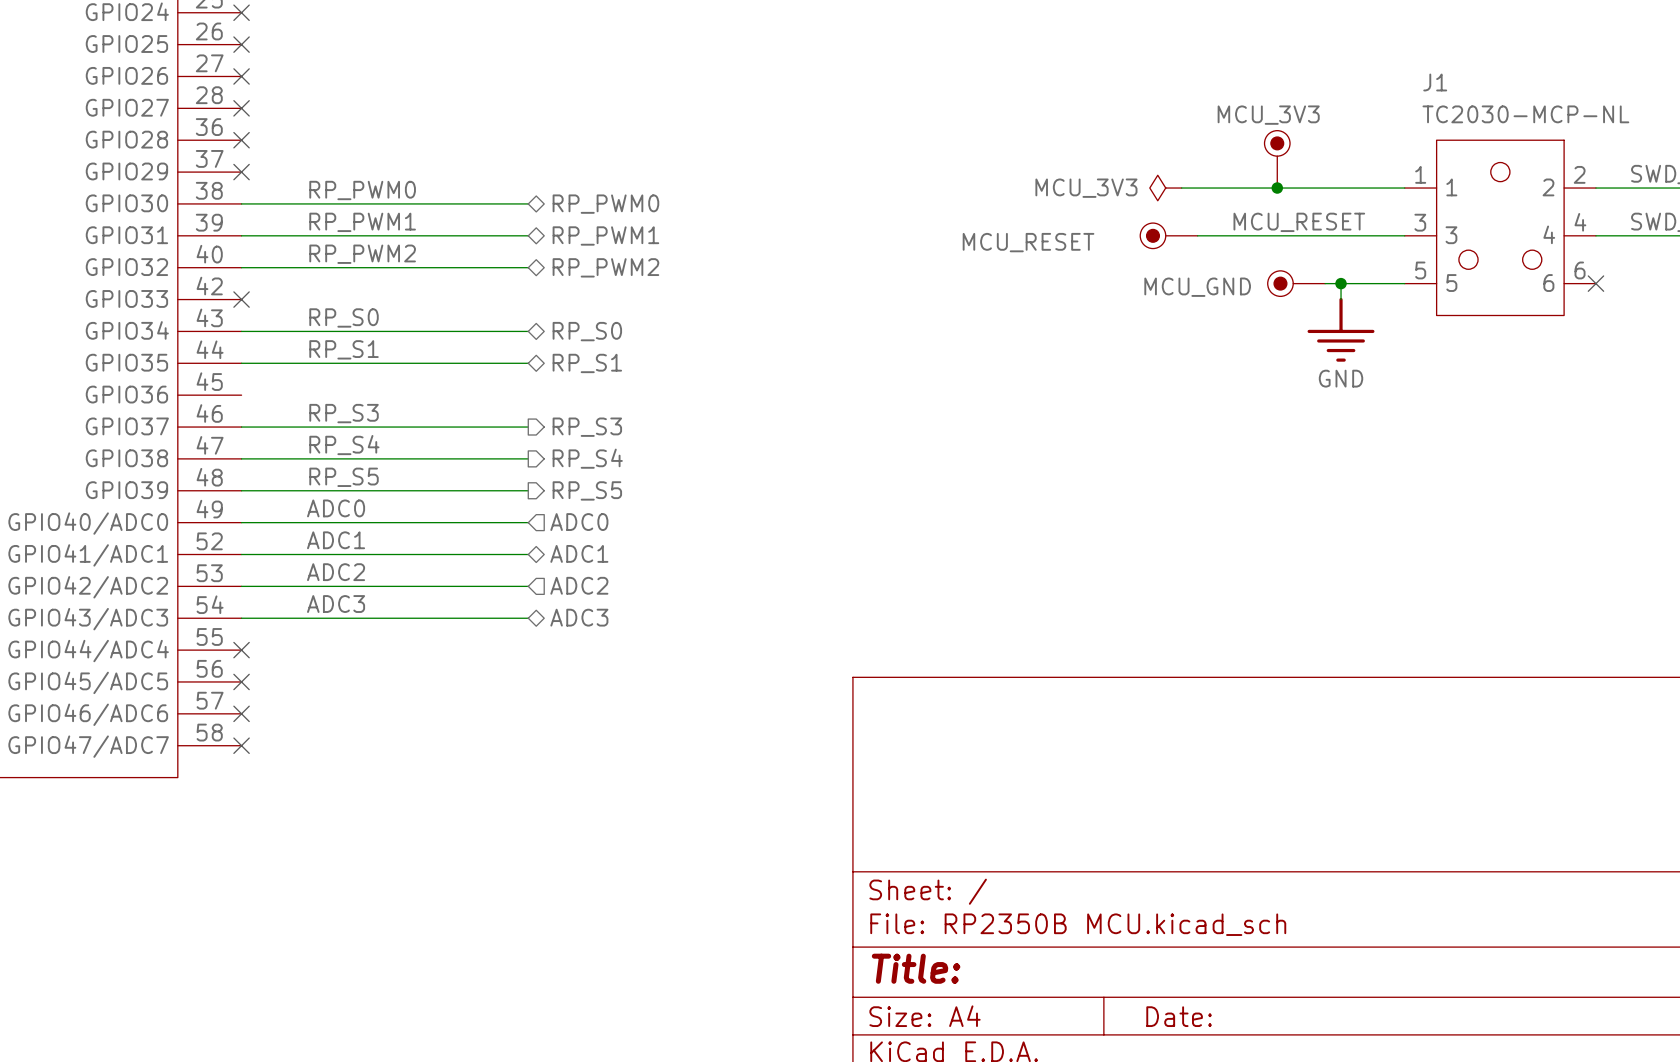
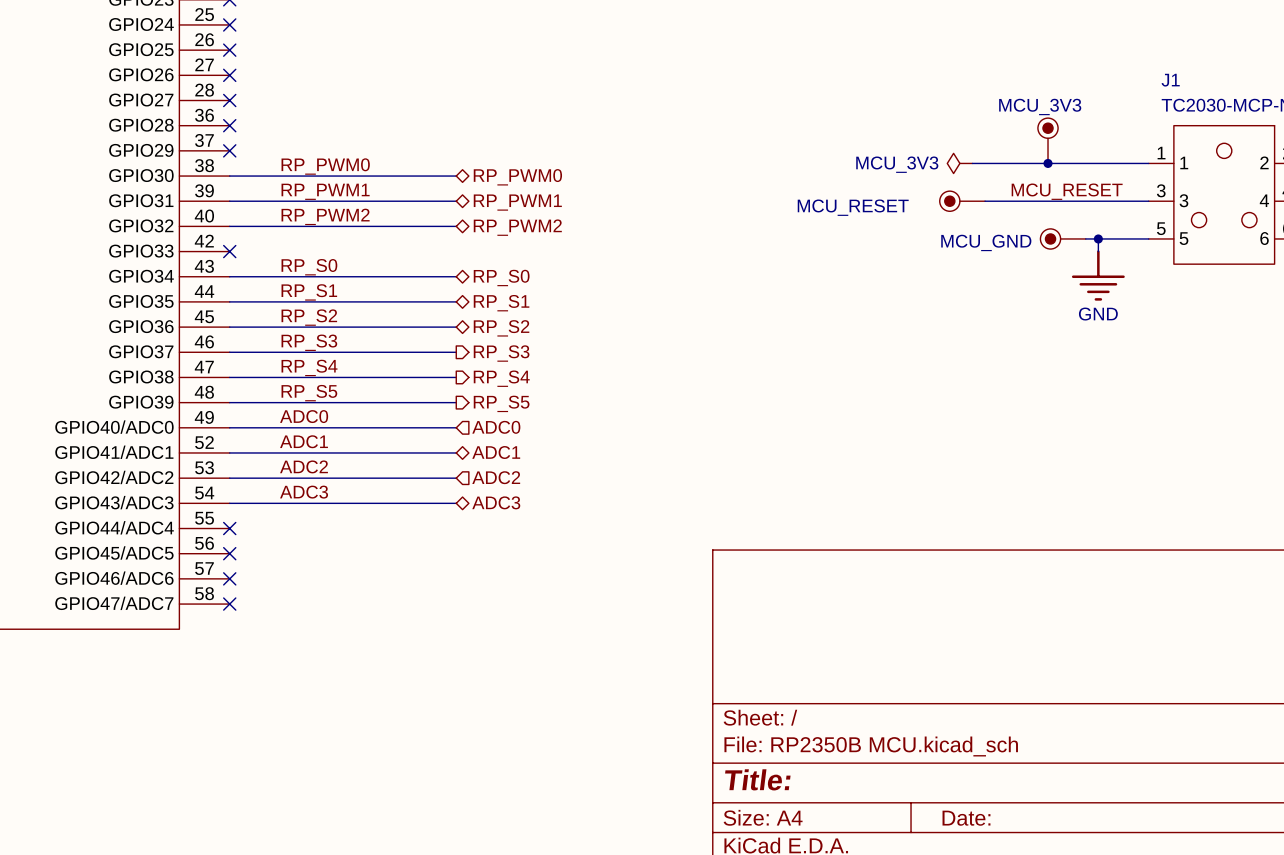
label: none -> RP_S2 (309, 317)
wire: none -> (229, 327) (456, 327)
hierarchical label: none -> RP_S2 (501, 328)

